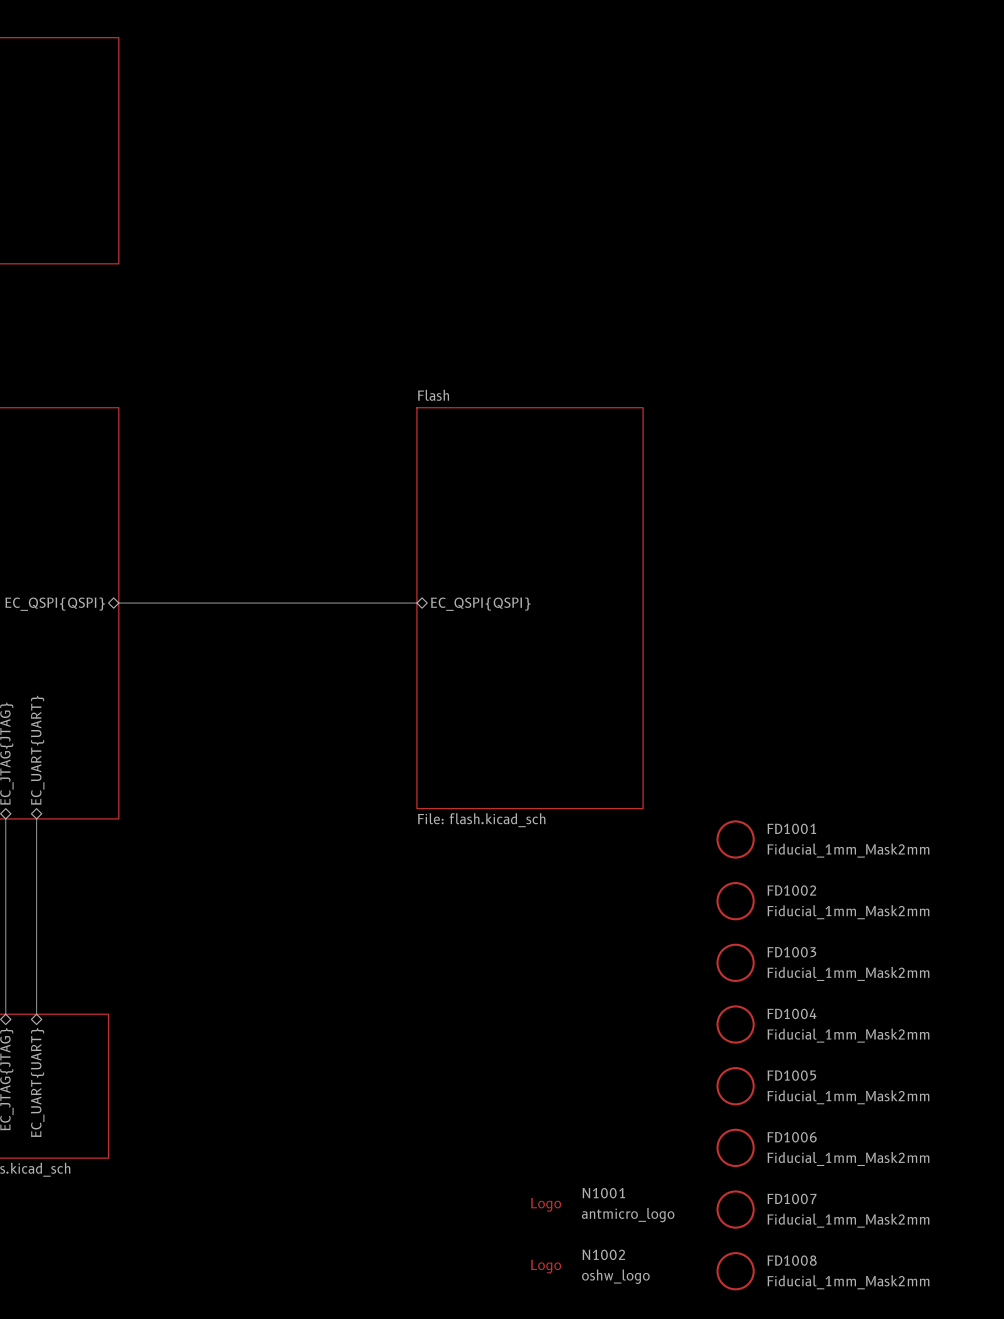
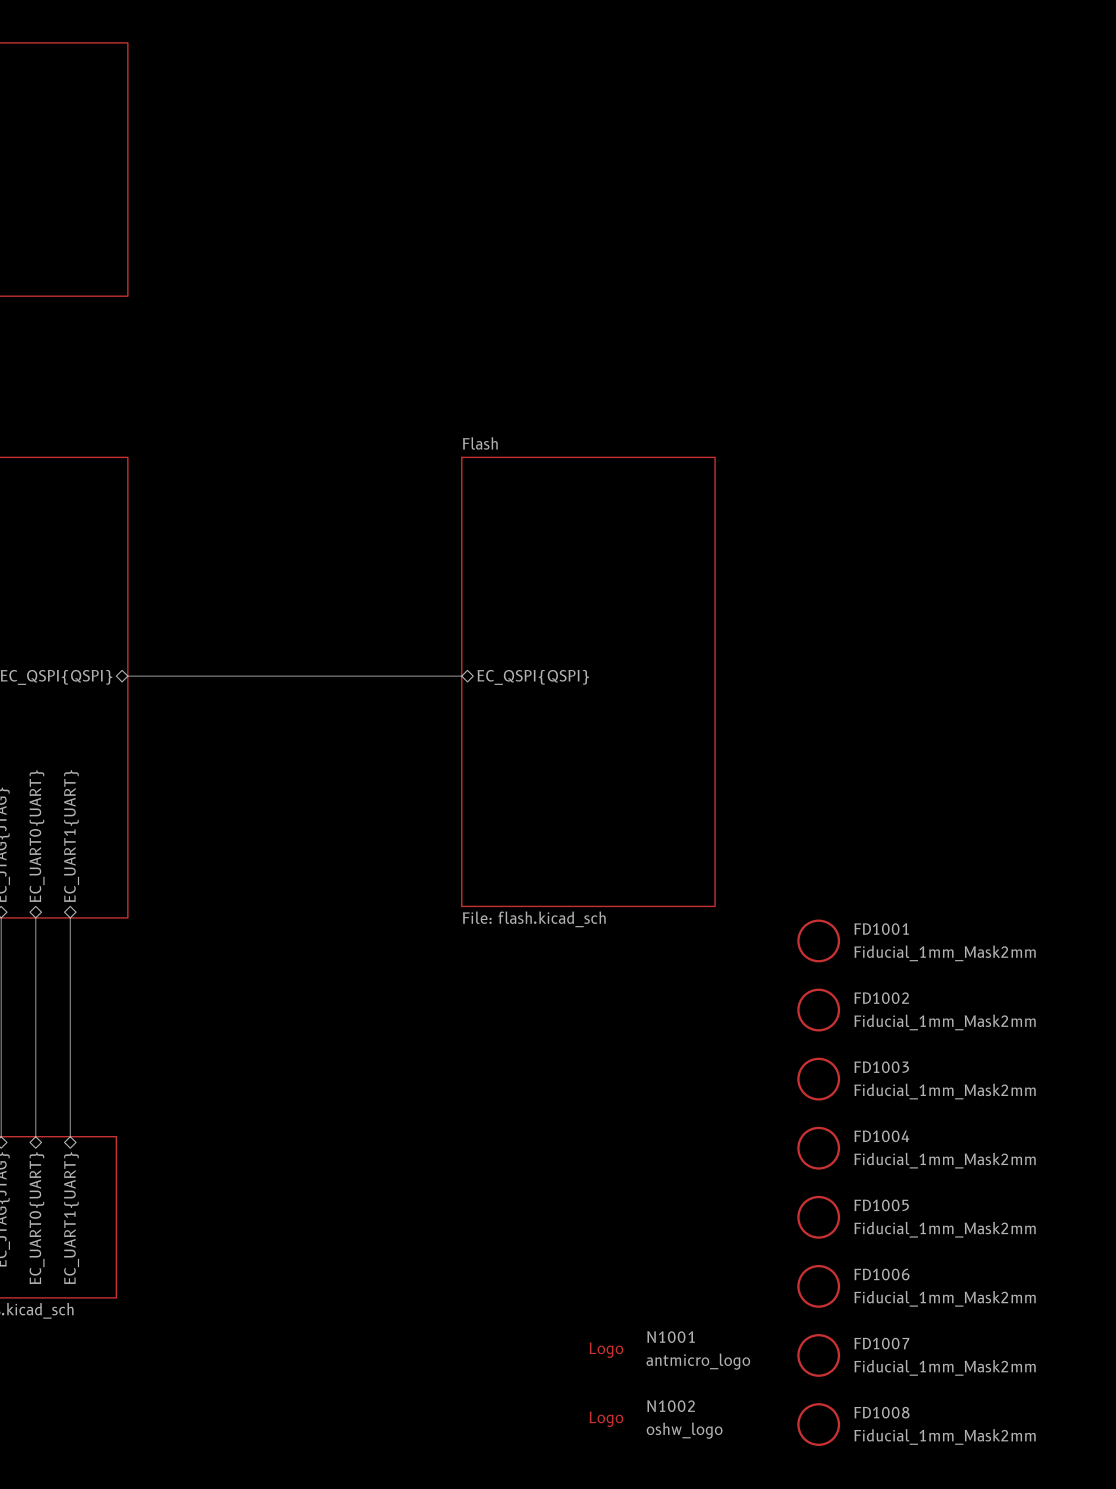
sheet pin: none -> EC_UART1{UART} (71, 836)
sheet pin: EC_UART{UART} (37, 750) -> EC_UART0{UART} (37, 836)
bus: none -> (70, 917) (70, 1136)
sheet pin: EC_UART{UART} (37, 1082) -> EC_UART0{UART} (37, 1218)
sheet pin: none -> EC_UART1{UART} (71, 1218)

